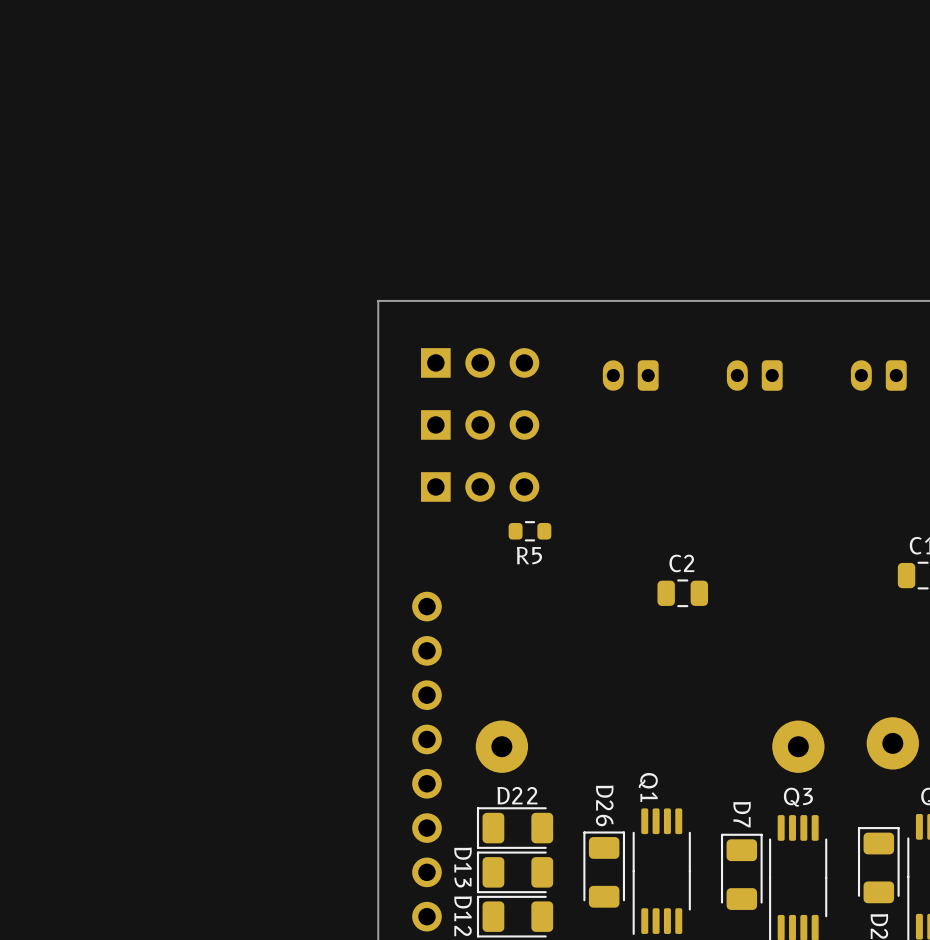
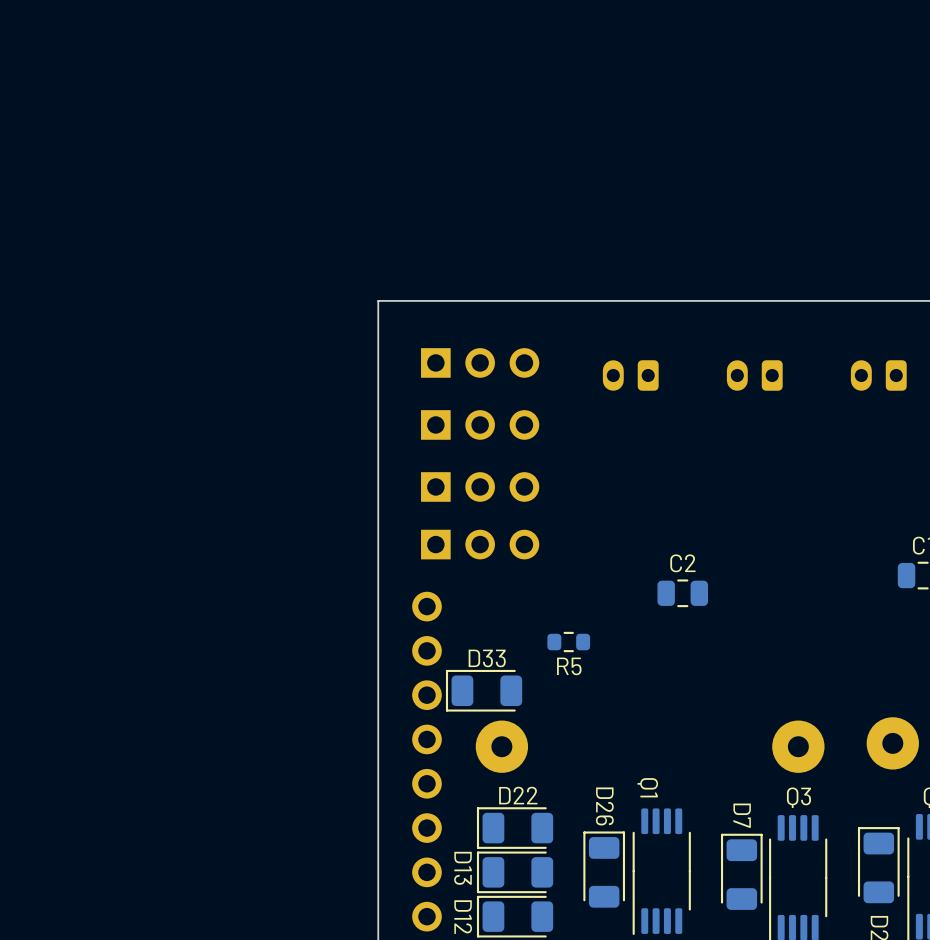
R5 position: (529, 531) -> (568, 642)
part: none -> (480, 544)
D33: none -> (484, 690)

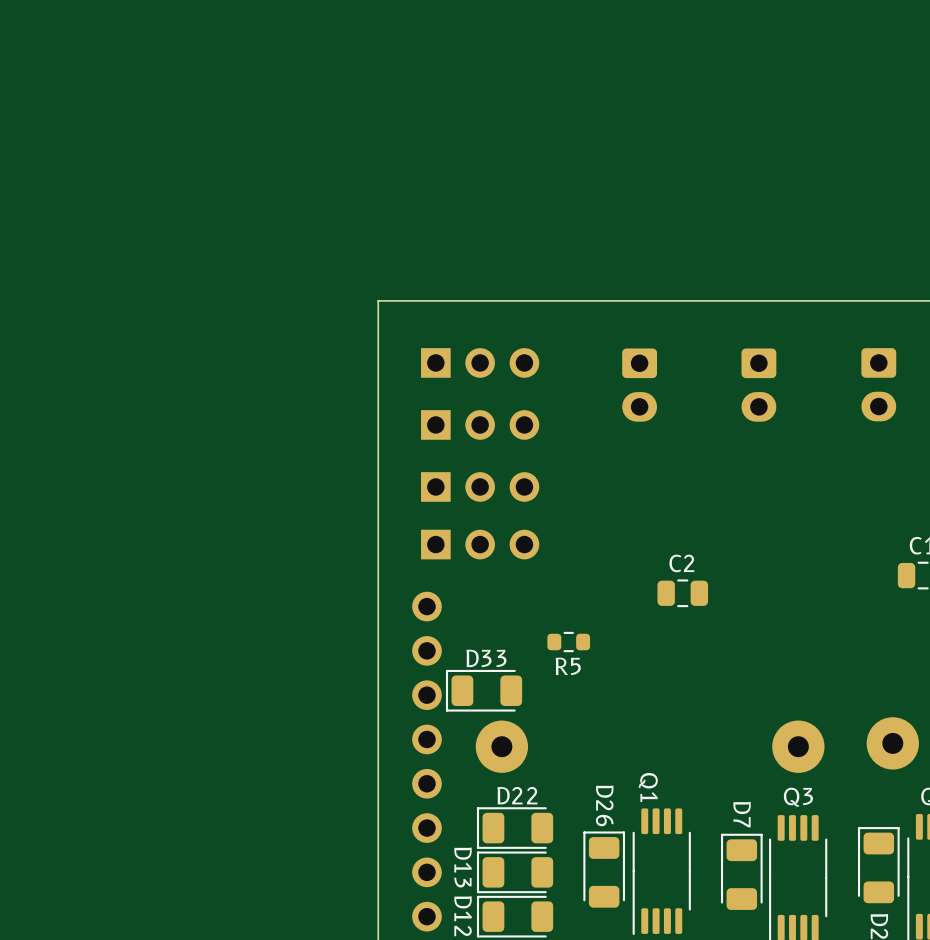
part footprint: [602, 360, 659, 391] -> [622, 348, 658, 422]
part footprint: [726, 360, 783, 391] -> [741, 348, 777, 422]
part footprint: [850, 360, 907, 391] -> [861, 348, 897, 422]

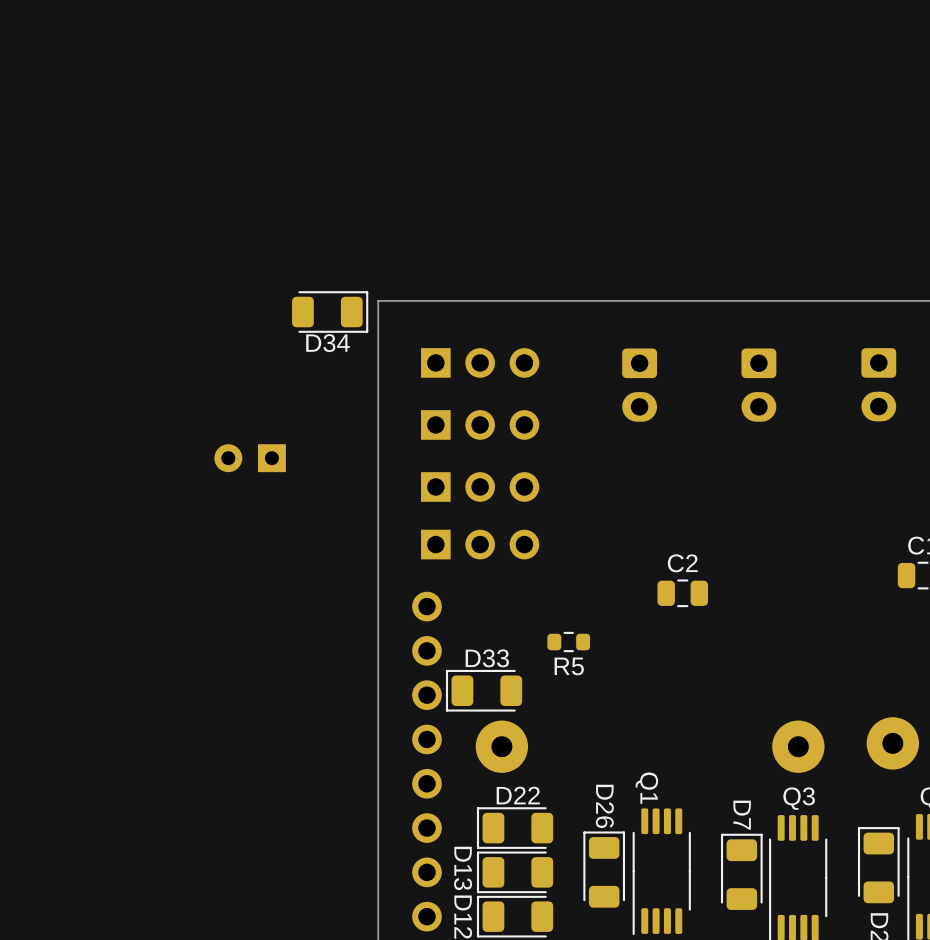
D34: none -> (330, 312)
part: none -> (250, 458)

